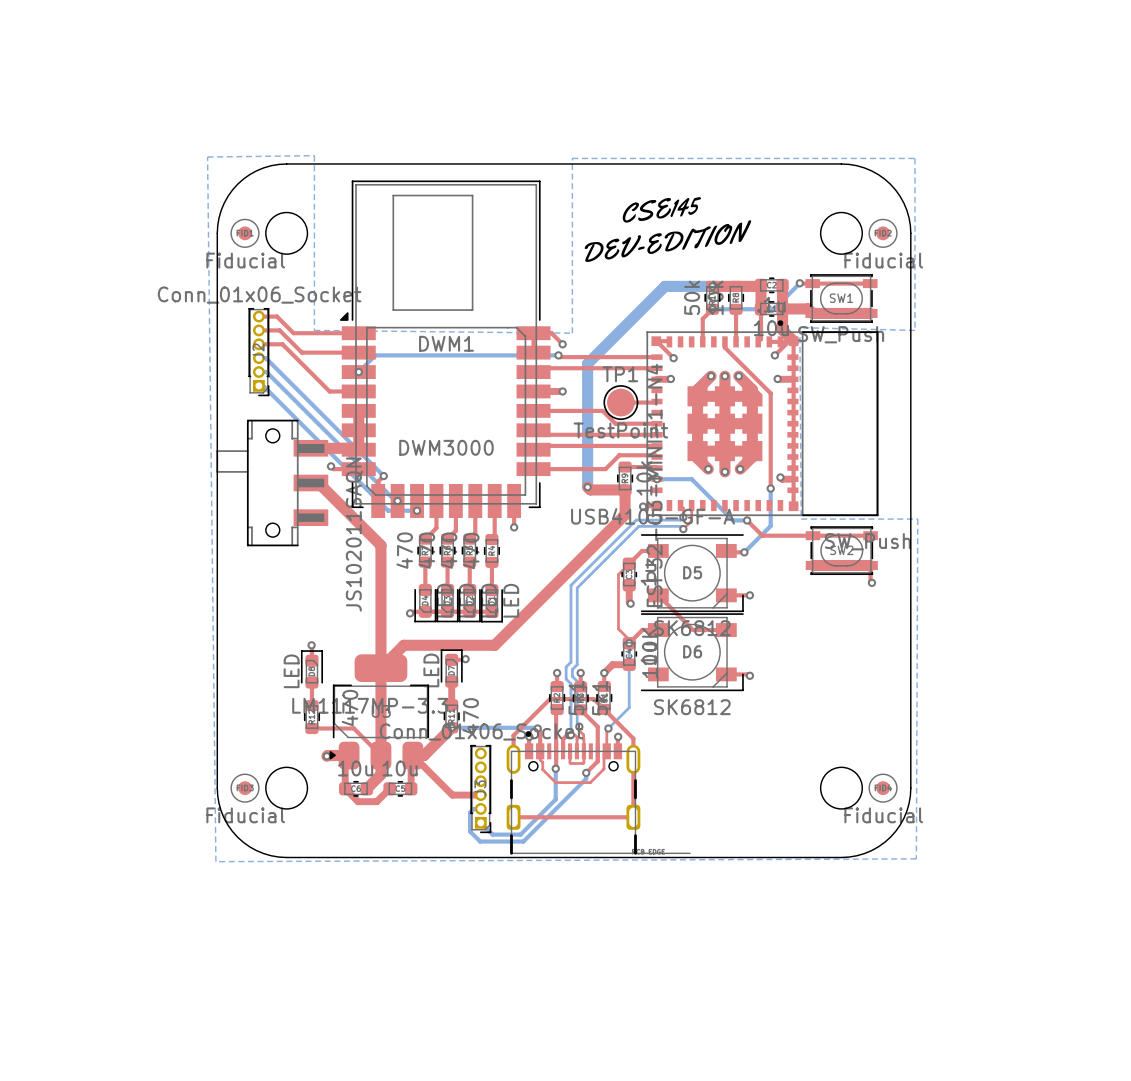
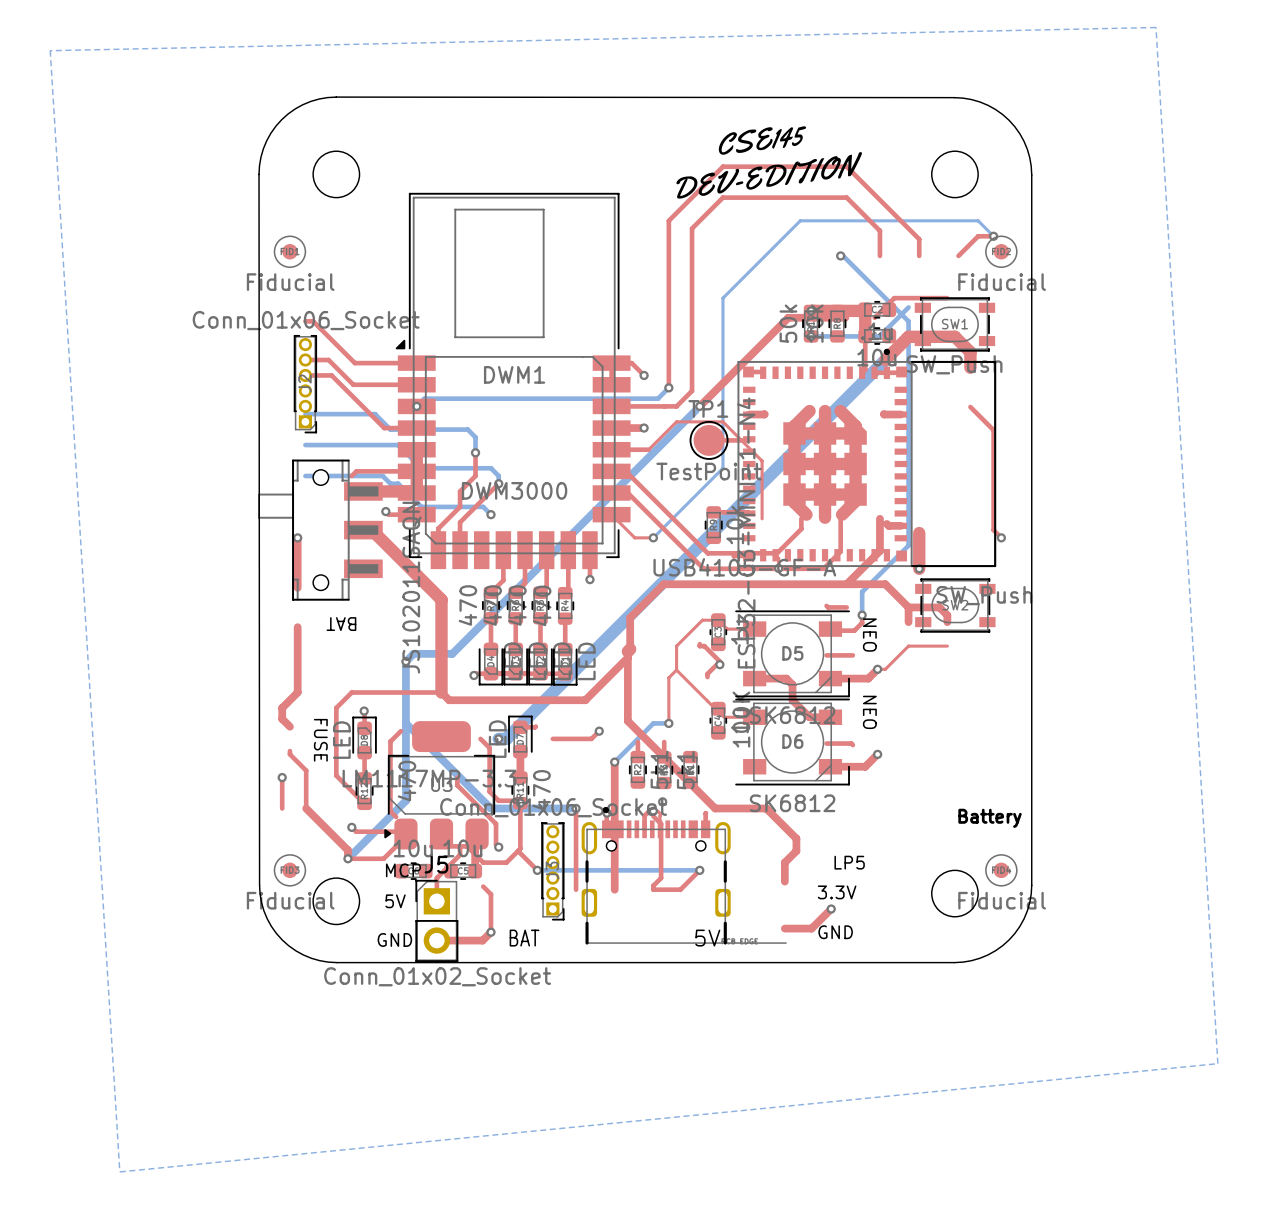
bottom zone outline: none -> (1156, 27) (1217, 1063) (119, 1171) (50, 50) (1156, 27)
bottom zone outline: (314, 155) (207, 157) (215, 861) (916, 858) (917, 519) (801, 519) (799, 327) (914, 330) (914, 158) (572, 158) (572, 333) (314, 330) (314, 155) -> none
board edge: (286, 163) (841, 163) (856, 165) (871, 170) (884, 179) (895, 190) (906, 210) (910, 233) (910, 788) (909, 803) (903, 818) (895, 831) (884, 842) (864, 853) (841, 857) (286, 857) (271, 855) (256, 850) (243, 842) (232, 831) (221, 811) (217, 788) (217, 225) (224, 203) (237, 184) (256, 170) (271, 165) (286, 163) -> (336, 97) (319, 99) (302, 104) (281, 119) (266, 140) (259, 165) (259, 885) (263, 910) (276, 933) (288, 945) (303, 954) (319, 960) (336, 962) (954, 962) (979, 958) (1002, 945) (1014, 933) (1024, 918) (1029, 902) (1031, 885) (1031, 174) (1027, 149) (1014, 126) (1002, 114) (987, 105) (971, 99) (954, 97) (336, 97)
top track: none -> (993, 236) (978, 236) (958, 255)
bottom track: none -> (993, 236) (978, 220) (800, 220) (722, 298) (722, 468) (653, 537)
via: none -> (993, 236)
drawing position: (667, 229) -> (769, 162)
round board edge position: (286, 233) -> (336, 174)
round board edge position: (841, 233) -> (954, 174)
via: none -> (840, 255)
top track: none -> (919, 255) (919, 239) (846, 166) (722, 166) (668, 220) (668, 387)
top track: none -> (947, 298) (894, 298) (874, 317)
top track: (799, 283) (870, 283) -> none
via: (799, 283) -> none
top track: (782, 285) (782, 330) (793, 341) -> none
bottom track: (712, 286) (664, 286) (587, 363) (587, 487) -> none
top track: none -> (845, 317) (788, 317) (699, 406)
top track: (782, 308) (808, 308) (812, 313) (870, 313) -> none
top track: (712, 309) (702, 318) (702, 341) -> none
top track: (736, 309) (736, 341) -> none
top track: (258, 316) (276, 316) (293, 333) (303, 333) -> (305, 321) (313, 321) (354, 363)
top track: none -> (885, 360) (908, 336) (954, 336) (970, 352) (970, 367)
bottom track: none -> (885, 360) (506, 738) (498, 738)
top track: (656, 341) (673, 358) -> none
top track: (724, 341) (724, 347) (770, 393) (770, 488) -> none
top track: (793, 341) (789, 341) (774, 355) -> none
top track: (793, 341) (793, 506) -> none
top track: (558, 355) (560, 357) (656, 357) -> none
bottom track: (558, 355) (375, 355) (365, 365) -> (668, 387) (658, 398) (424, 398)
via position: (558, 355) -> (668, 387)
via: (774, 355) -> none
bottom track: (258, 358) (265, 358) (383, 476) -> none
via: (673, 358) -> none
top track: (656, 368) (537, 368) (533, 372) -> (879, 255) (879, 230) (846, 197) (722, 197) (692, 228) (692, 390) (676, 406) (611, 406)
bottom track: (258, 372) (266, 372) (397, 501) -> none
via: none -> (699, 406)
top track: none -> (970, 407) (993, 430) (993, 530) (1001, 537)
bottom track: none -> (695, 410) (452, 653) (413, 653) (405, 661) (405, 800) (347, 858)
via: (711, 376) -> none
via: (724, 376) -> none
via: (738, 376) -> none
bottom track: none -> (305, 414) (375, 414) (390, 429) (467, 429) (475, 437) (475, 452)
via: (670, 378) -> none
via: (777, 378) -> none
bottom track: (258, 385) (263, 385) (388, 510) (417, 510) -> none
bottom track: none -> (305, 445) (398, 445) (421, 468) (490, 468) (498, 475) (498, 483)
top track: (566, 410) (602, 410) (615, 423) (656, 423) -> (648, 449) (676, 421) (722, 421) (762, 460) (762, 518)
top track: none -> (475, 452) (475, 475) (460, 491) (460, 506) (444, 522)
via: none -> (475, 452)
top track: none -> (416, 471) (356, 471) (351, 475)
top track: (533, 430) (538, 434) (656, 434) -> (611, 471) (625, 471) (707, 553) (777, 553) (801, 529) (801, 518)
bottom track: none -> (305, 475) (382, 475) (390, 483) (398, 483) (421, 506) (483, 506) (490, 514)
top track: none -> (498, 483) (460, 522) (460, 550)
via: none -> (498, 483)
top track: (656, 445) (537, 445) (533, 449) -> (840, 518) (840, 551) (823, 568) (703, 568) (627, 493) (611, 493)
top track: (656, 456) (655, 455) (619, 455) (605, 469) (533, 469) -> (653, 537) (634, 537) (611, 514)
via: none -> (490, 514)
via: (708, 469) -> none
via: (740, 469) -> none
via: (724, 471) -> none
top track: none -> (879, 518) (879, 551) (846, 584)
via: (383, 476) -> none
via: (780, 477) -> none
bottom track: (656, 479) (691, 479) (733, 520) (747, 520) -> none
via: (656, 479) -> none
top track: none -> (919, 533) (919, 568)
top track: (587, 487) (590, 489) (625, 489) (625, 514) (550, 589) -> (908, 607) (885, 584) (663, 584) (630, 617) (630, 649)
via position: (587, 487) -> (653, 537)
bottom track: (770, 488) (770, 526) -> (840, 255) (843, 255) (908, 321) (908, 545) (876, 578)
via: (770, 488) -> none
top track: none -> (297, 537) (297, 587)
via: none -> (297, 537)
via: none -> (1001, 537)
via: (397, 501) -> none
top track: (691, 505) (691, 520) (683, 529) -> none
via: (643, 506) -> none
via: (417, 510) -> none
bottom track: (683, 517) (680, 520) (636, 520) (570, 585) (570, 662) (566, 666) (566, 679) (570, 683) (570, 735) -> none
via: none -> (919, 568)
top track: (747, 520) (762, 535) (870, 535) -> none
via: (747, 520) -> none
bottom track: (683, 529) (680, 526) (638, 526) (577, 587) (577, 664) (572, 669) (572, 676) (577, 681) (577, 724) (579, 726) -> none
via: (683, 529) -> none
bottom track: (758, 538) (744, 552) -> (862, 591) (862, 615)
top track: (658, 550) (642, 550) (618, 574) (618, 628) (629, 639) (629, 643) (642, 630) (658, 630) -> none
via position: (744, 552) -> (862, 615)
top track: none -> (908, 607) (939, 607) (947, 615) (947, 622)
top track: none -> (908, 607) (908, 622)
top track: none -> (862, 615) (862, 622) (854, 630) (830, 629)
top track: (813, 565) (870, 565) (871, 582) -> none
text: none -> BAT (341, 624)
top track: none -> (297, 627) (297, 692) (282, 707) (282, 718) (289, 726)
top track: none -> (754, 629) (727, 629) (718, 620) (702, 620) (676, 646) (676, 670)
D5 position: (692, 573) -> (792, 653)
text: none -> NEO (869, 635)
via: (871, 582) -> none
top track: none -> (699, 644) (699, 646) (704, 646) (719, 661) (707, 673) (707, 677)
top track: (629, 585) (630, 603) -> none
top track: none -> (947, 646) (908, 646) (885, 669) (877, 669) (868, 678) (830, 678)
top track: (548, 591) (494, 645) (403, 645) (380, 668) -> (627, 651) (627, 721) (715, 808) (766, 808) (796, 838) (796, 851) (784, 862) (784, 881)
top track: (658, 595) (693, 630) (726, 630) -> none
via: (749, 595) -> none
via: none -> (405, 661)
via: none -> (877, 669)
top track: none -> (676, 670) (724, 717) (754, 717)
top track: none -> (676, 670) (668, 677) (668, 723)
top track: none -> (754, 678) (786, 678) (792, 684) (792, 700) (809, 717) (830, 717)
top track: (380, 628) (380, 774) (366, 788) -> none
bottom track: (629, 643) (629, 707) (608, 728) -> none
via: (629, 643) -> none
text: none -> NEO (869, 712)
D6 position: (692, 652) -> (792, 741)
bottom track: none -> (405, 723) (490, 808) (576, 808)
bottom track: none -> (668, 723) (653, 723) (614, 762)
via: none -> (668, 723)
via: (465, 659) -> none
top track: none -> (400, 731) (390, 741) (390, 811) (396, 817)
top track: none -> (599, 731) (591, 738) (552, 738)
via: none -> (599, 731)
top track: (629, 664) (612, 664) (604, 673) (604, 686) -> none
top track: none -> (480, 738) (489, 747) (489, 791) (498, 800) (518, 800) (520, 803) (520, 848) (506, 862) (483, 862) (467, 846) (431, 846)
via: none -> (498, 738)
text: none -> FUSE (320, 740)
via: (557, 673) -> none
via: (580, 673) -> none
via: (604, 673) -> none
via position: (749, 675) -> (877, 754)
top track: none -> (289, 751) (289, 754) (306, 770) (306, 808) (347, 850) (347, 858) (383, 858) (396, 846)
top track: none -> (877, 754) (865, 766) (830, 766)
top track: none -> (614, 762) (614, 889)
via: none -> (614, 762)
top track: none -> (282, 777) (282, 808)
via: none -> (282, 777)
top track: none -> (457, 777) (457, 785) (496, 823) (496, 844) (498, 847)
top track: (557, 709) (555, 768) -> none
top track: (580, 709) (597, 726) (597, 761) (586, 772) -> none
top track: (579, 726) (579, 730) (583, 734) (583, 762) (570, 763) (570, 750) -> none
top track: (451, 727) (423, 755) (412, 755) (452, 795) (480, 795) -> none
bottom track: (451, 727) (537, 728) -> none
top track: (311, 728) (353, 728) (380, 755) -> (364, 803) (336, 775) (336, 707) (351, 692) (441, 692) (449, 700) (585, 700) (627, 657)
top track: (537, 728) (540, 731) (540, 759) (542, 762) (542, 769) (555, 782) (590, 782) (604, 769) (604, 754) (606, 751) (606, 730) (608, 728) -> none
via: (537, 728) -> none
via: (608, 728) -> none
top track: none -> (576, 808) (576, 889)
via: none -> (576, 808)
via: (618, 736) -> none
top track: none -> (653, 816) (661, 823) (661, 878) (653, 885) (653, 889) (680, 889) (699, 870)
text: none -> Battery (990, 818)
top track: none -> (351, 827) (356, 831) (396, 831)
via: none -> (351, 827)
top track: (326, 756) (349, 755) (345, 759) (345, 788) (358, 801) (376, 801) (389, 788) -> none
via: (326, 756) -> none
top track: (513, 759) (513, 735) (550, 699) (593, 699) (633, 738) (633, 817) (513, 817) -> none
top track: none -> (460, 846) (460, 854) (436, 878) (436, 901)
via: none -> (498, 847)
bottom track: (555, 768) (555, 799) (520, 834) (492, 834) (480, 822) -> none
via: (555, 768) -> none
top track: none -> (518, 851) (537, 870)
bottom track: (586, 772) (586, 778) (523, 841) (480, 841) (470, 831) (470, 812) (473, 808) (480, 808) -> none
via: (586, 772) -> none
via: none -> (347, 858)
text: none -> LP5 (849, 862)
round board edge position: (286, 788) -> (336, 901)
text: none -> MCP (403, 870)
bottom track: none -> (537, 870) (699, 870)
via: none -> (537, 870)
via: none -> (699, 870)
round board edge position: (841, 788) -> (954, 893)
top track: none -> (483, 886) (490, 894) (490, 932) (482, 940) (436, 940)
text: none -> 3.3V (837, 892)
text: none -> 5V (395, 901)
top track: none -> (831, 909) (811, 928) (784, 928)
via: none -> (831, 909)
J5: none -> Conn_01x02_Socket (436, 920)
via: none -> (490, 932)
text: none -> GND (835, 932)
text: none -> BAT (524, 938)
text: none -> 5V (707, 938)
text: none -> GND (394, 939)

